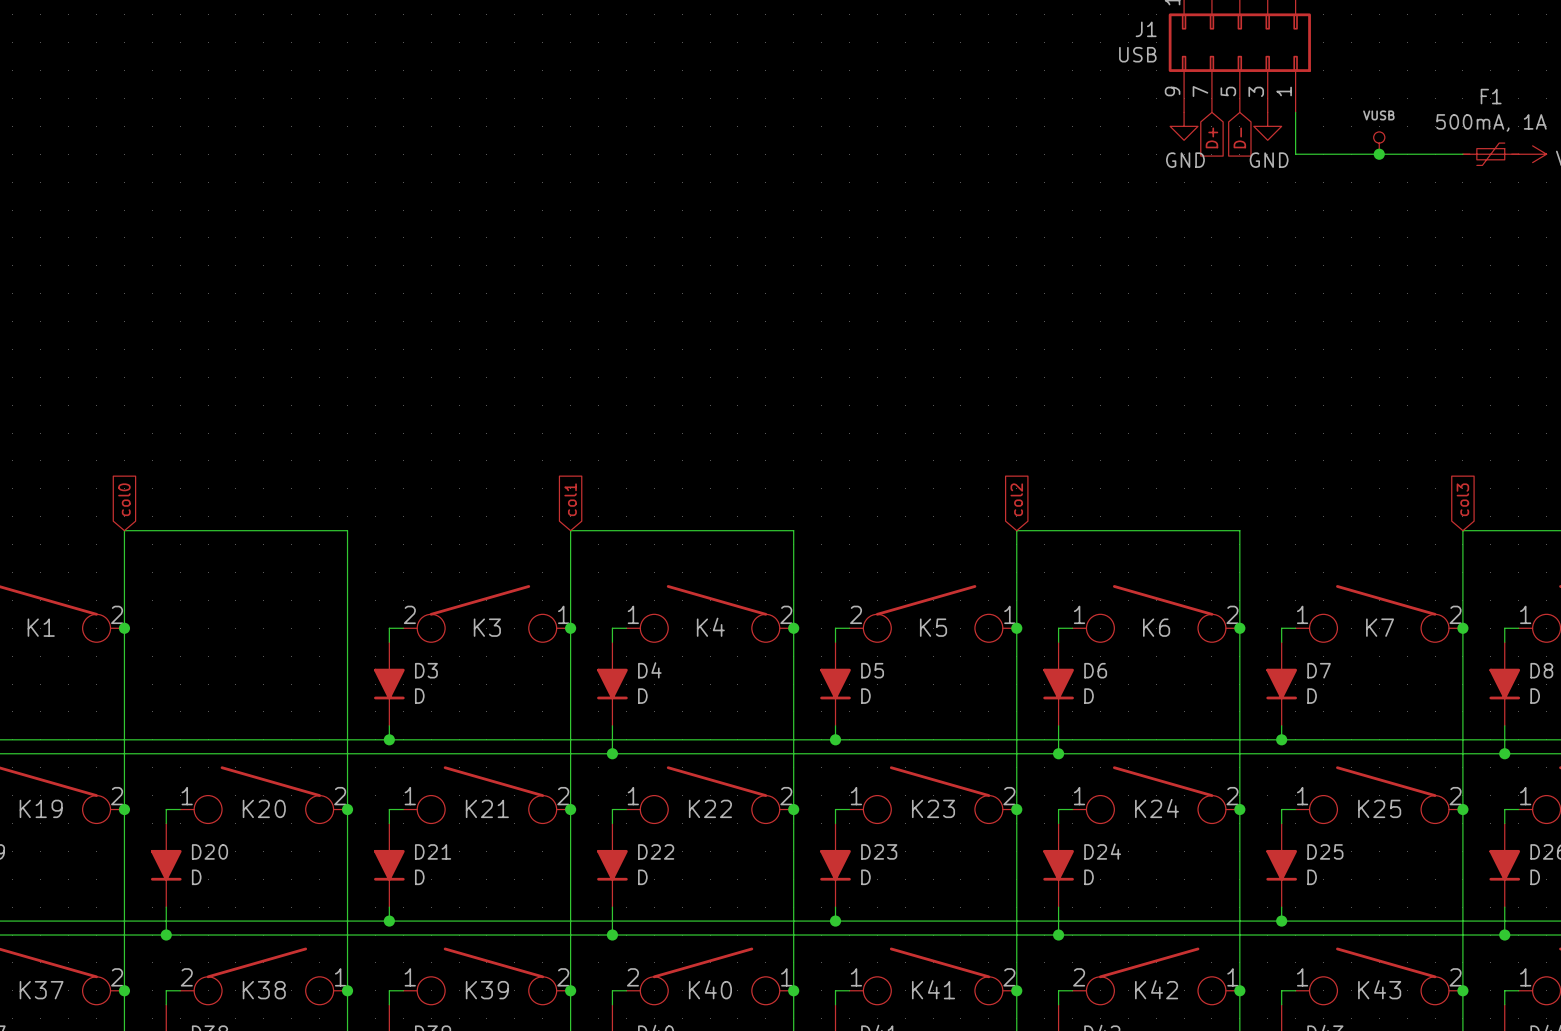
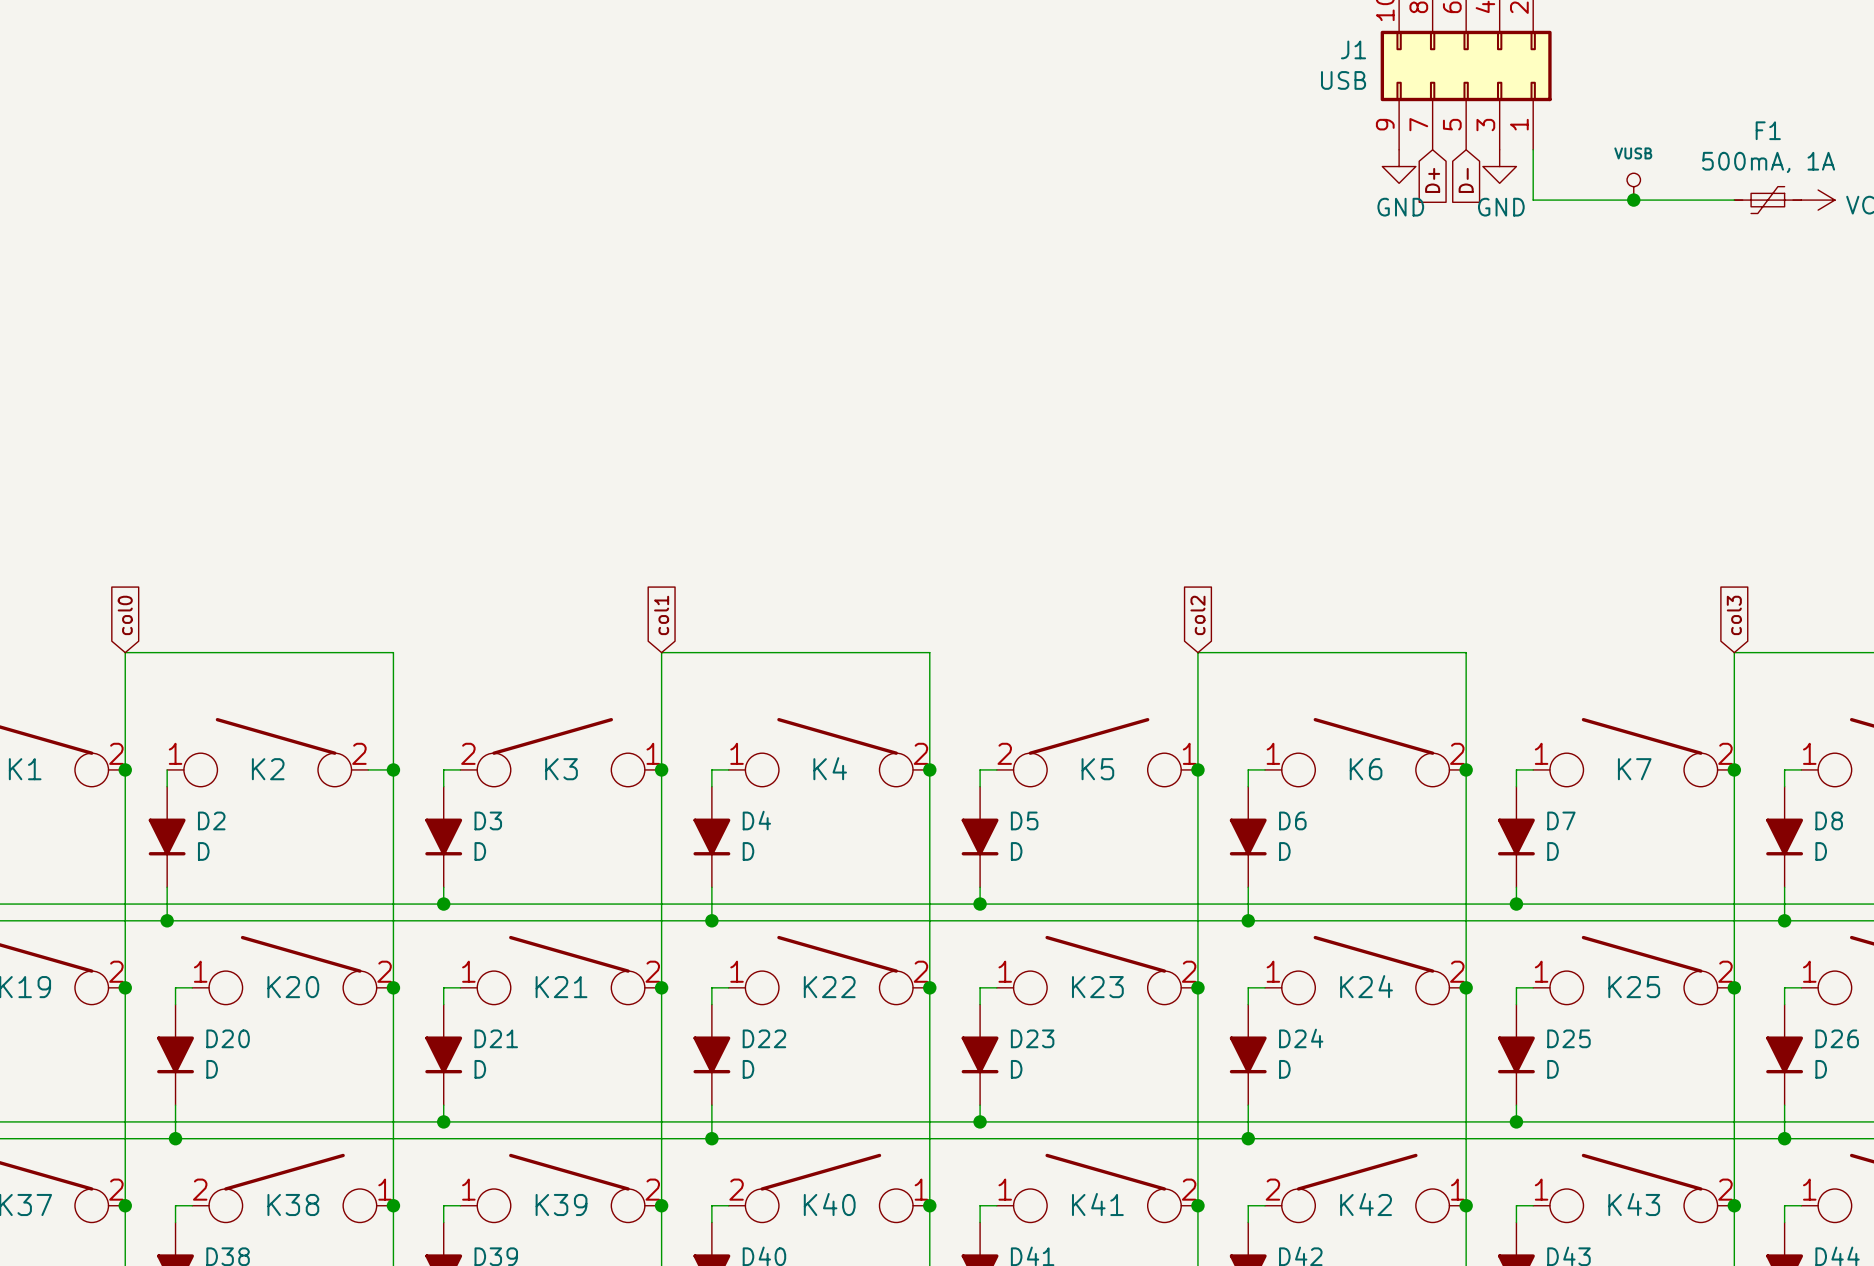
K2: none -> (267, 752)
wire: none -> (167, 769) (167, 786)
wire: none -> (368, 769) (393, 769)
junction: none -> (393, 769)
D2: none -> D (167, 837)
wire: none -> (167, 887) (167, 920)
junction: none -> (167, 920)

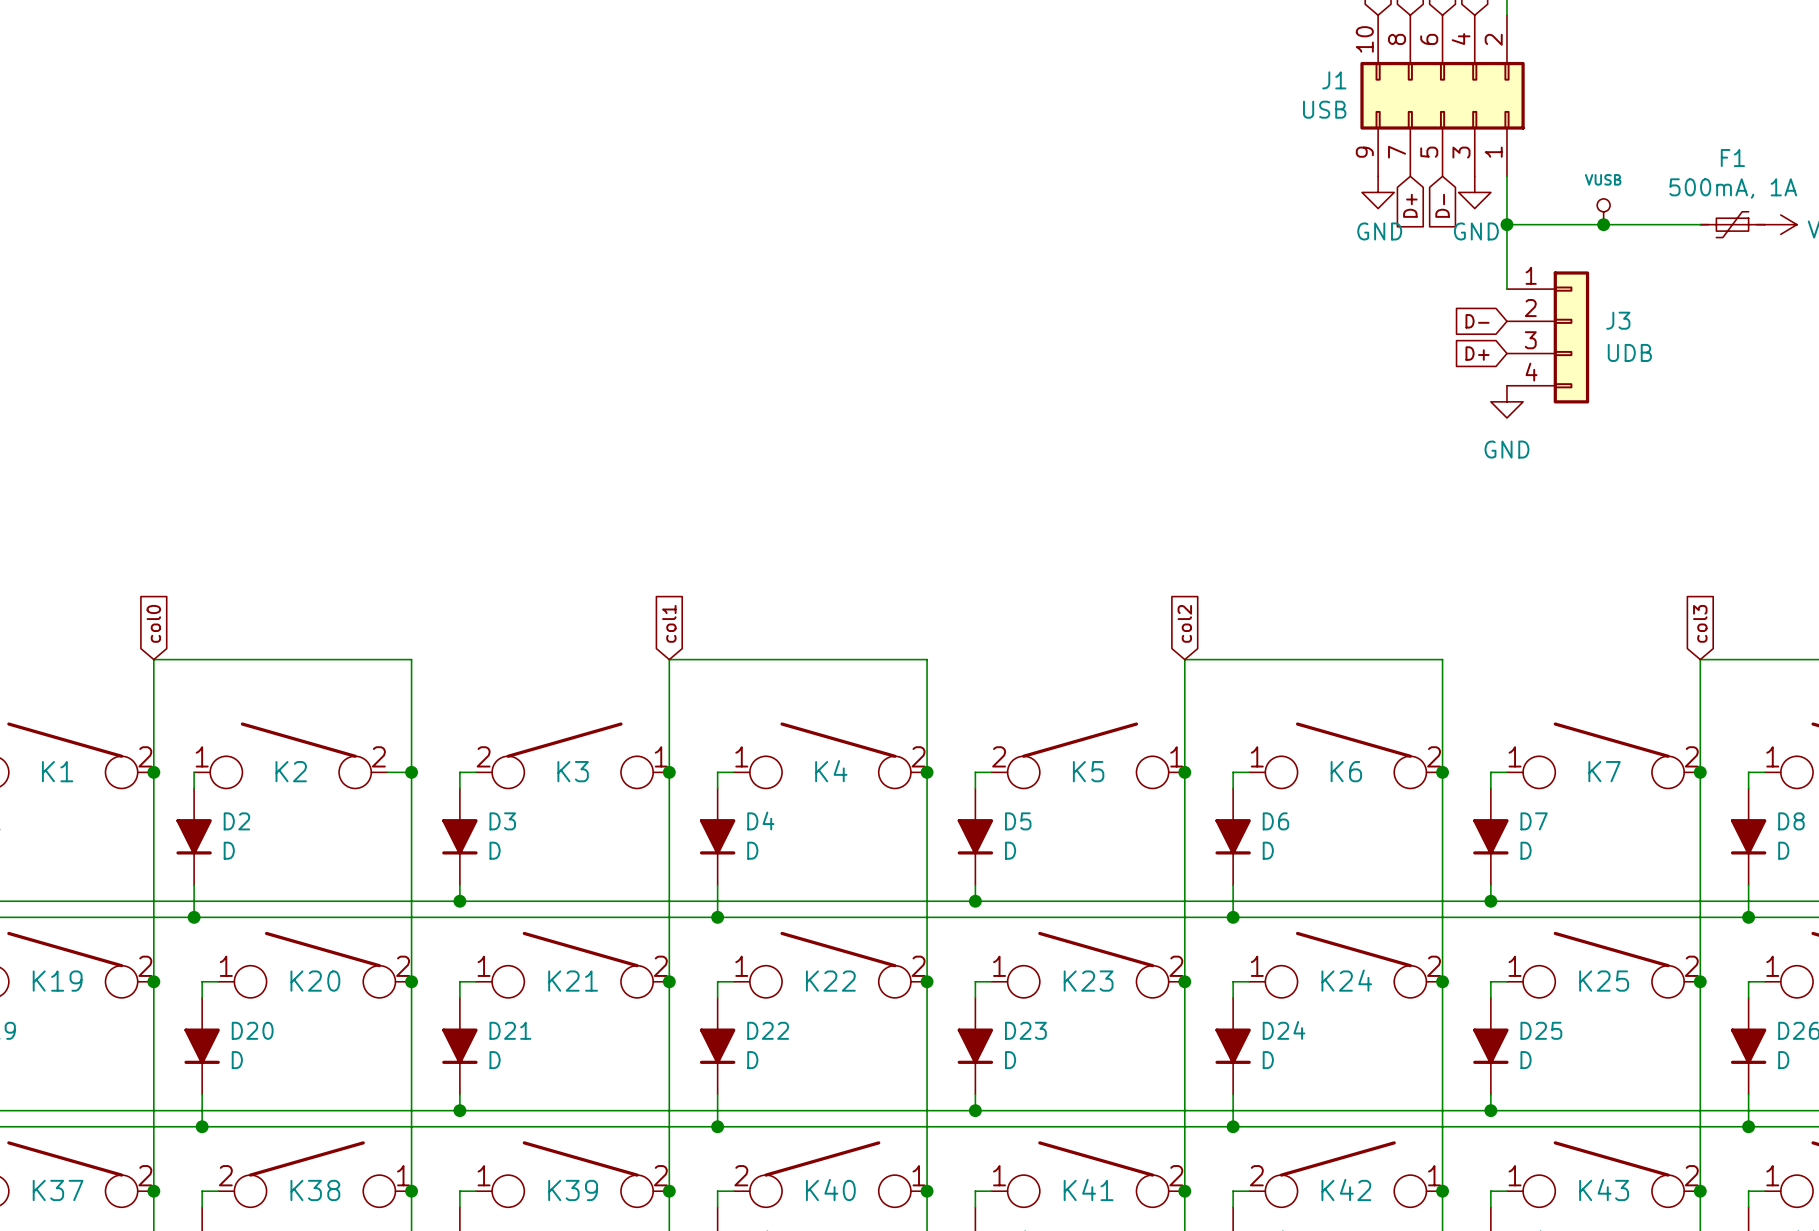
wire: none -> (1506, 224) (1506, 289)
junction: none -> (1506, 224)
global label: none -> D- (1477, 321)
J3: none -> UDB (1548, 337)
global label: none -> D+ (1477, 353)
power symbol: none -> GND (1506, 401)

